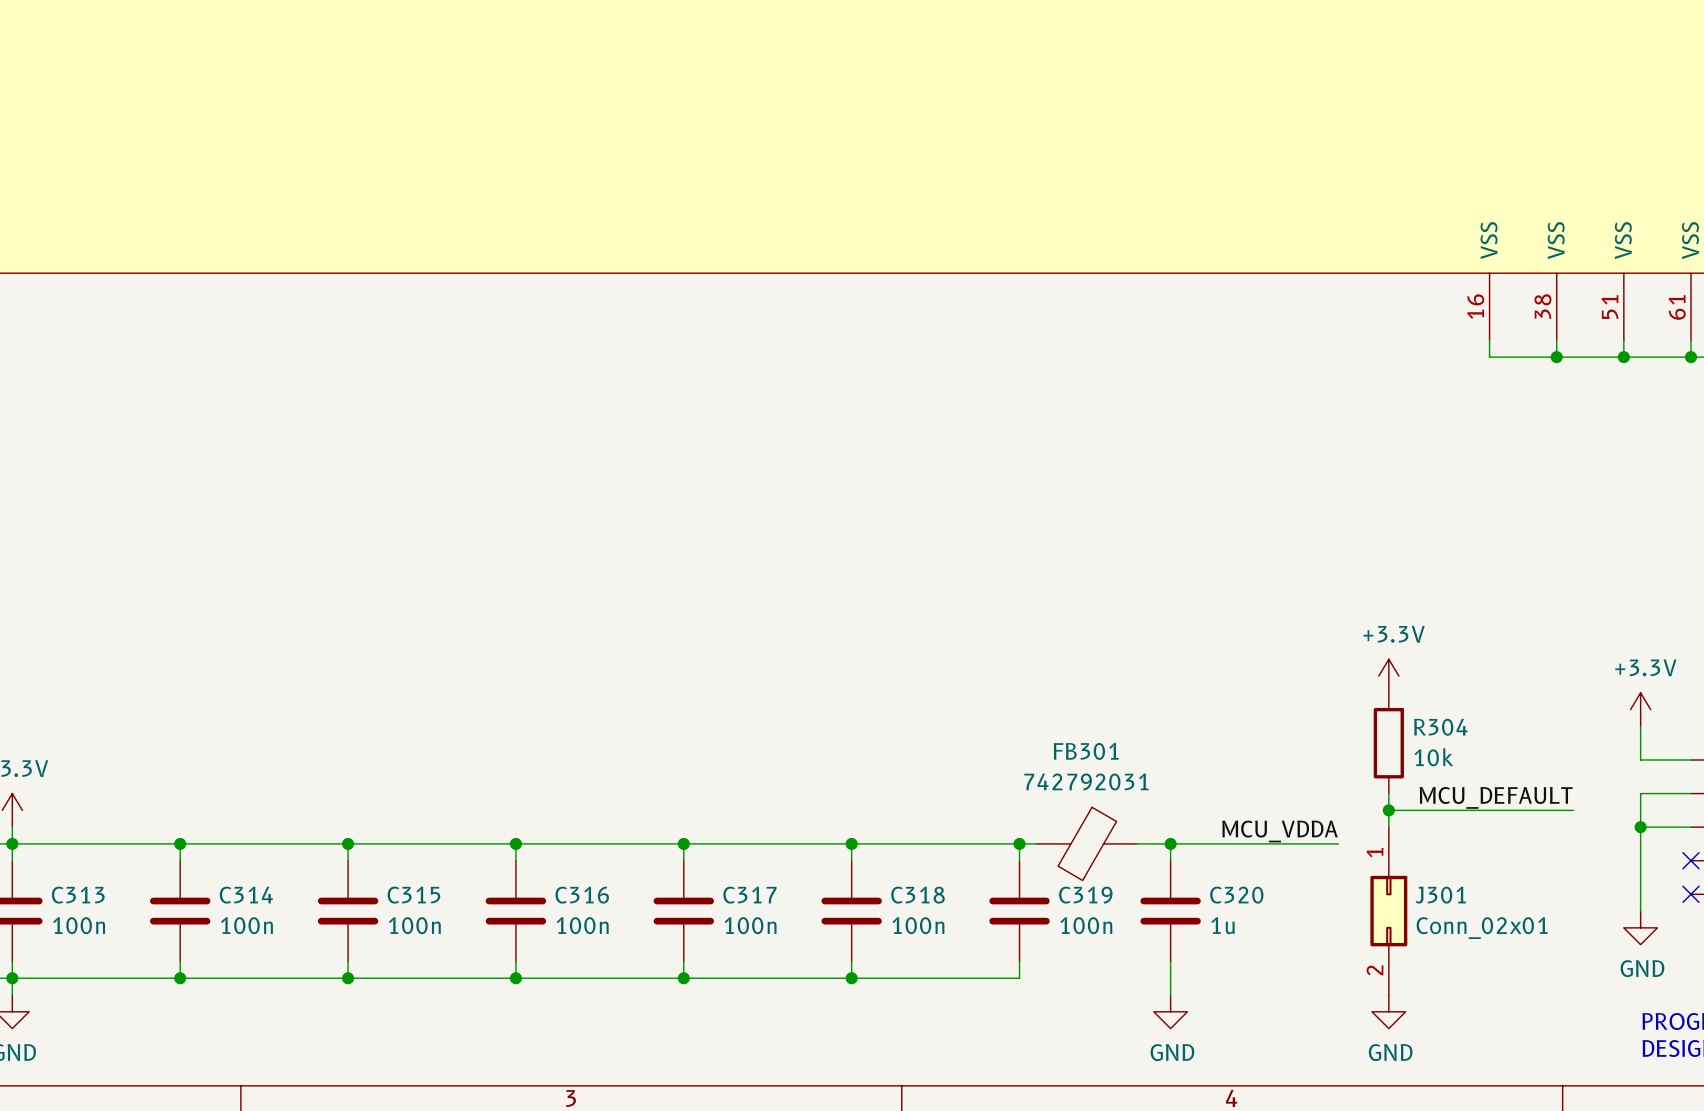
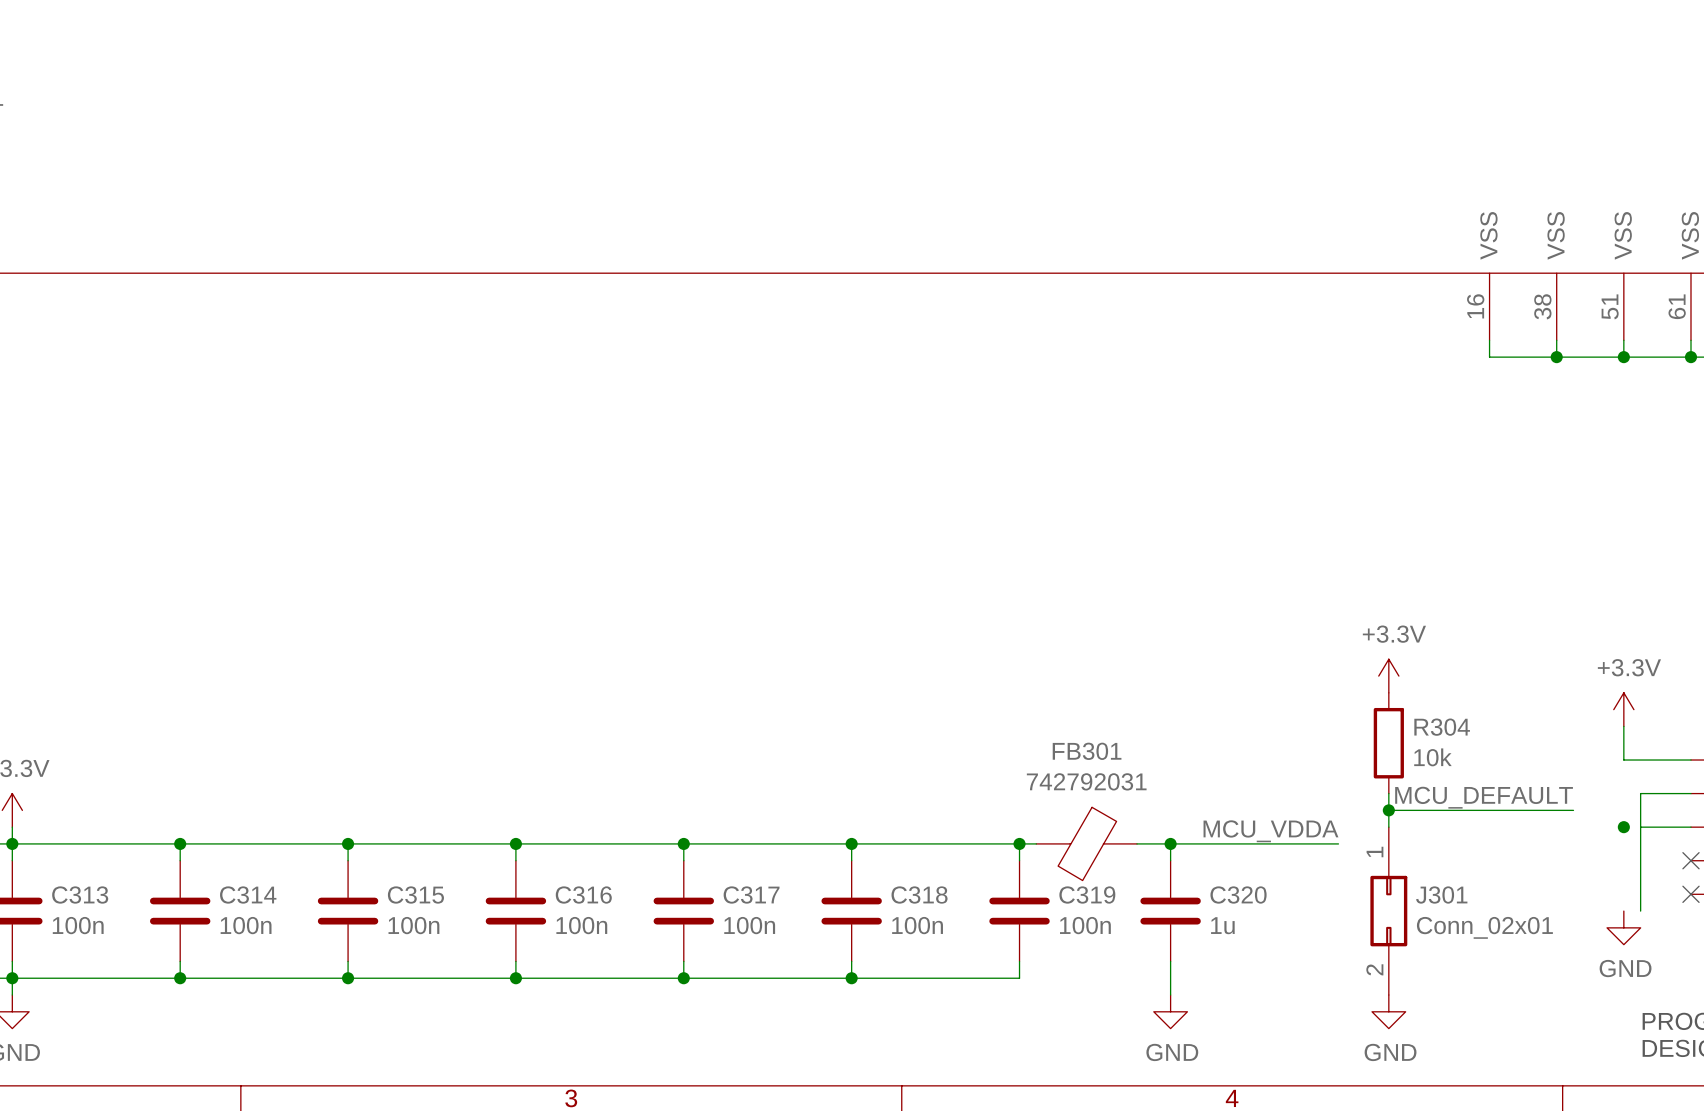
power symbol position: +3.3V (1640, 709) -> +3.3V (1623, 709)
wire: (1640, 726) (1640, 760) -> (1623, 726) (1623, 760) (1640, 760)
junction position: (1640, 827) -> (1623, 827)
power symbol position: GND (1640, 927) -> GND (1623, 927)

